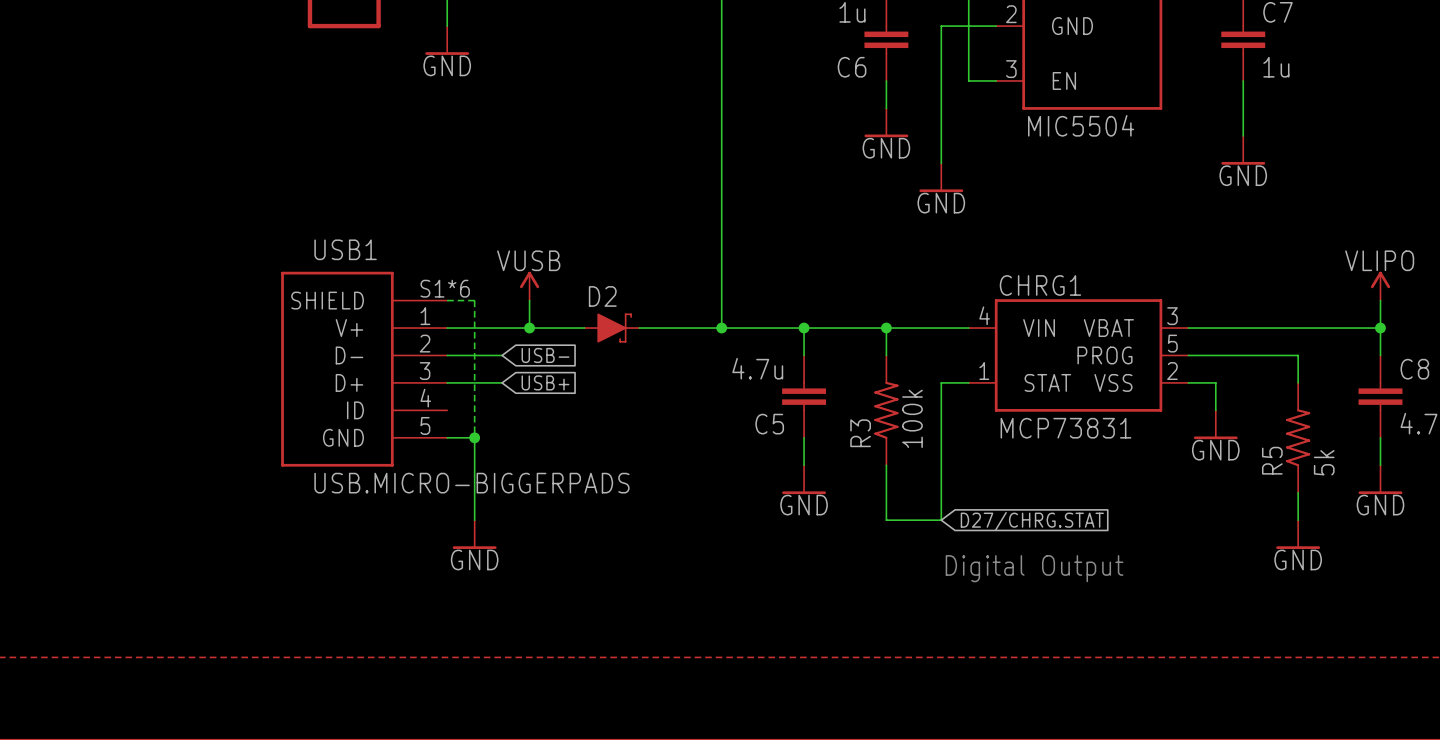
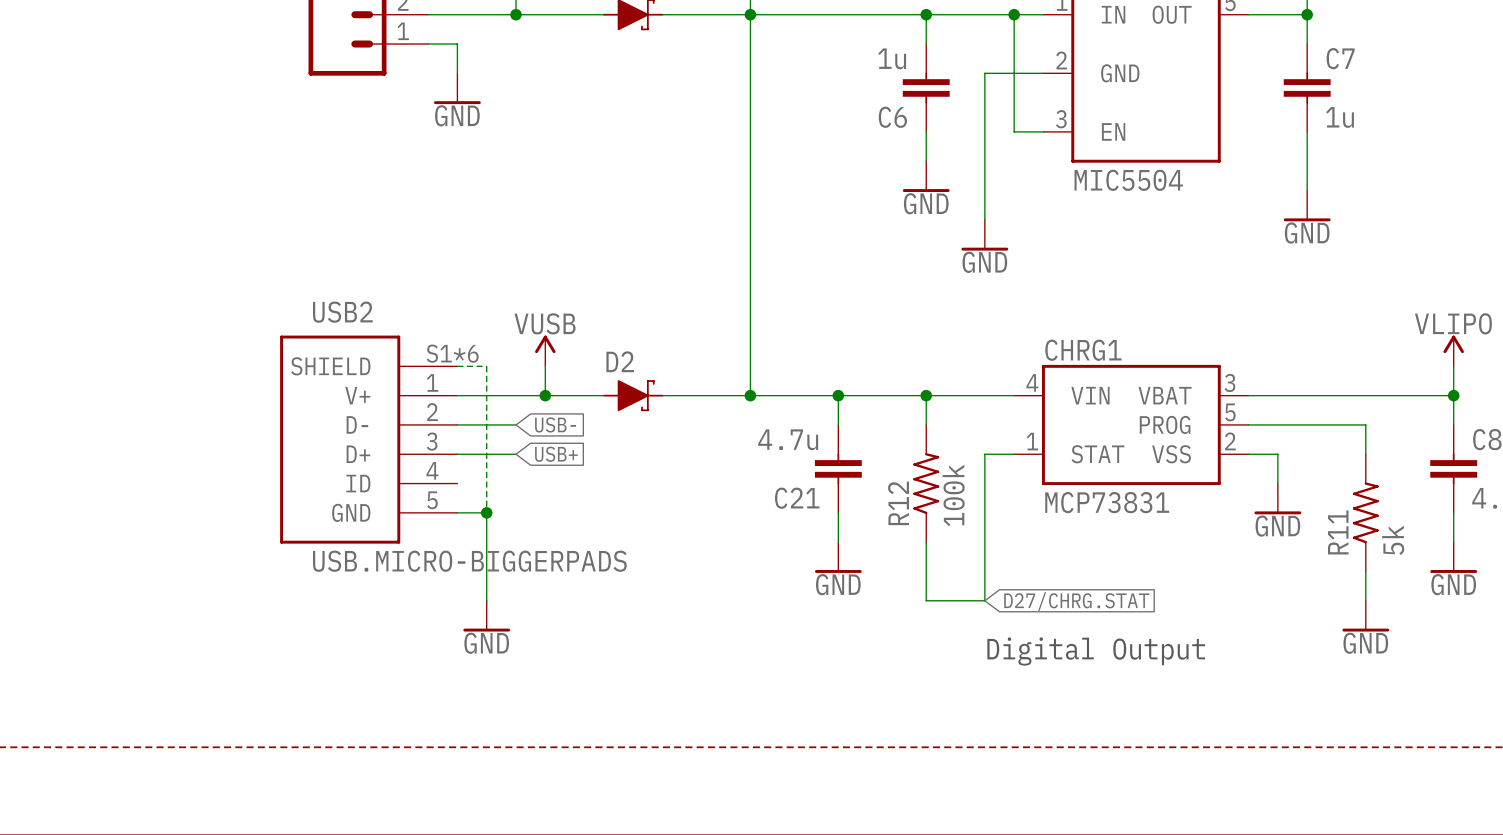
USB1 name: USB1 (345, 249) -> USB2 (342, 312)
C5 name: C5 (769, 424) -> C21 (797, 498)
R3 name: R3 (860, 433) -> R12 (898, 503)
R5 name: R5 (1272, 460) -> R11 (1338, 532)

